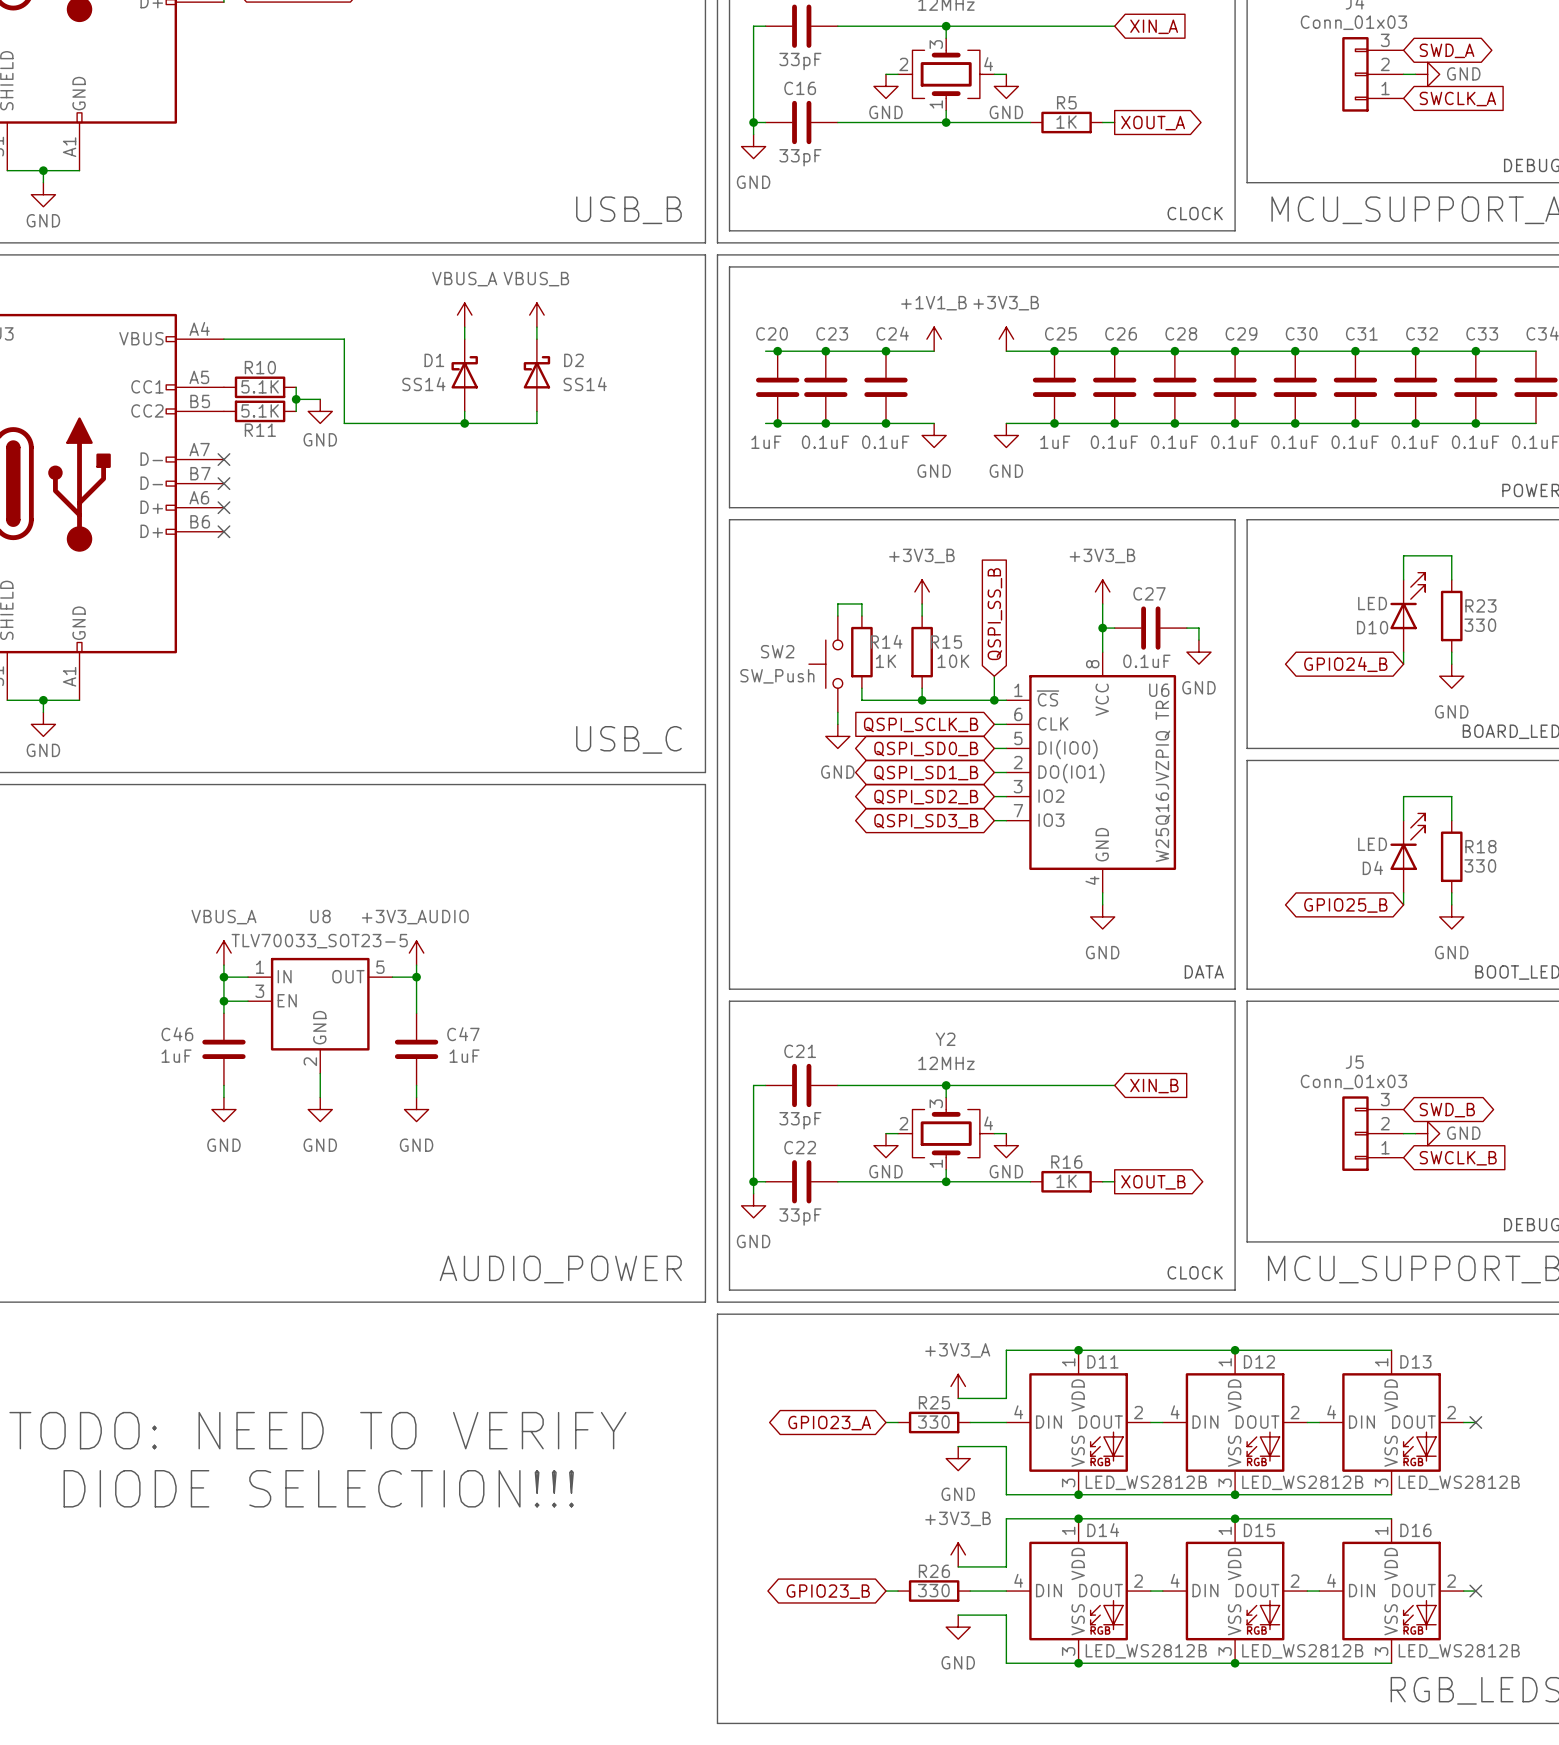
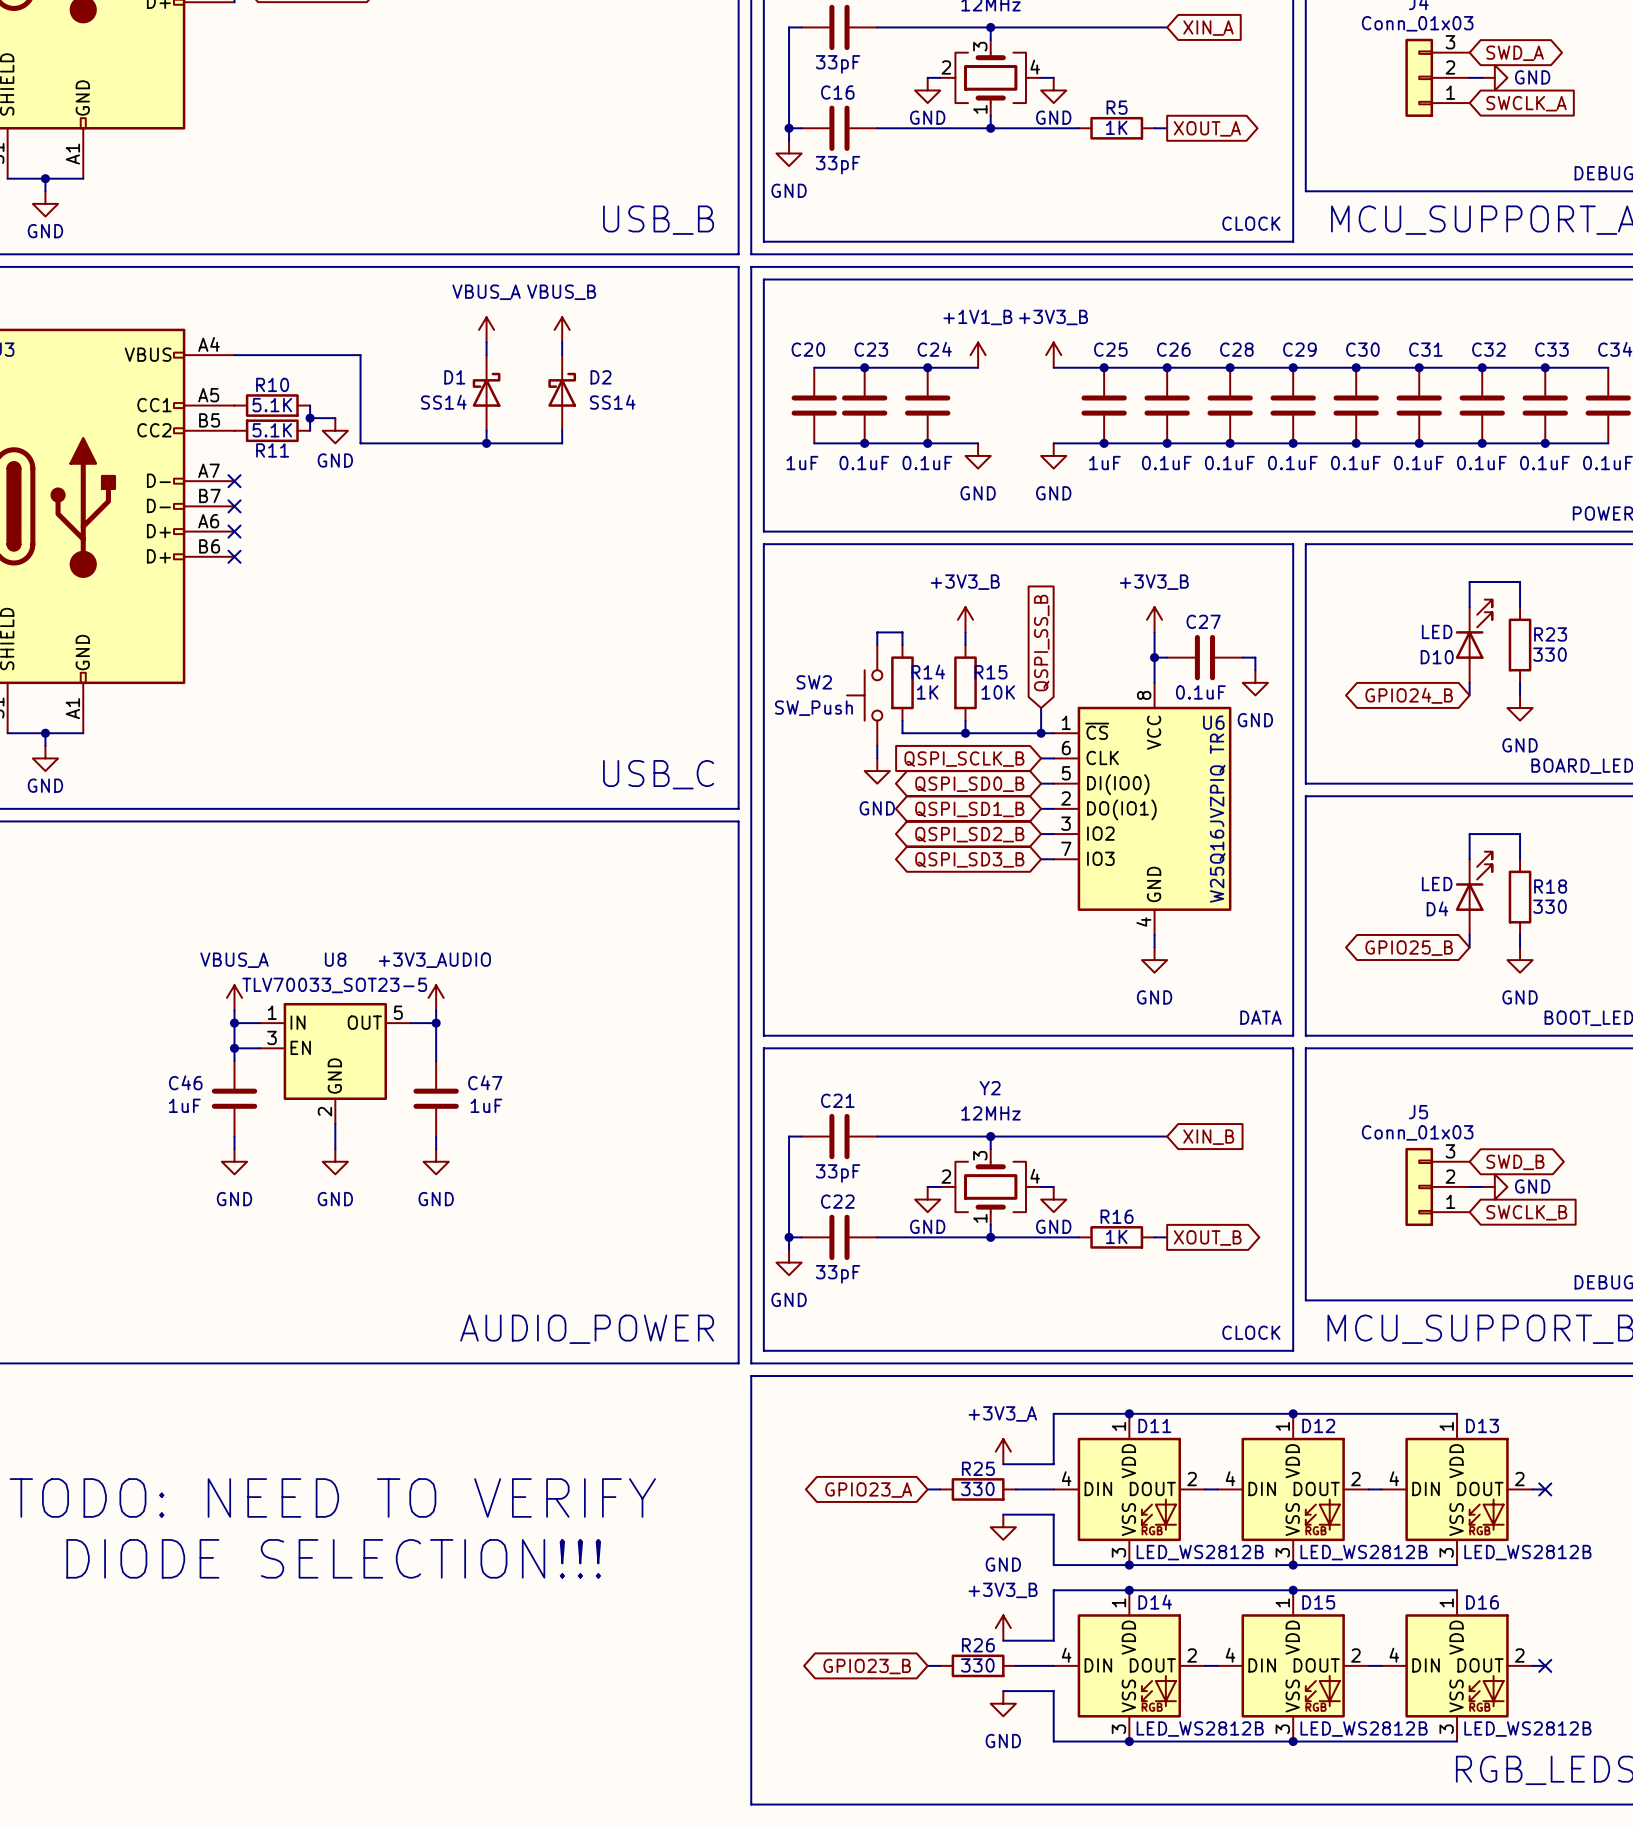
wire: (765, 351) (777, 351) -> none
junction: (777, 351) -> none
wire: (765, 423) (777, 423) -> none
junction: (777, 423) -> none

